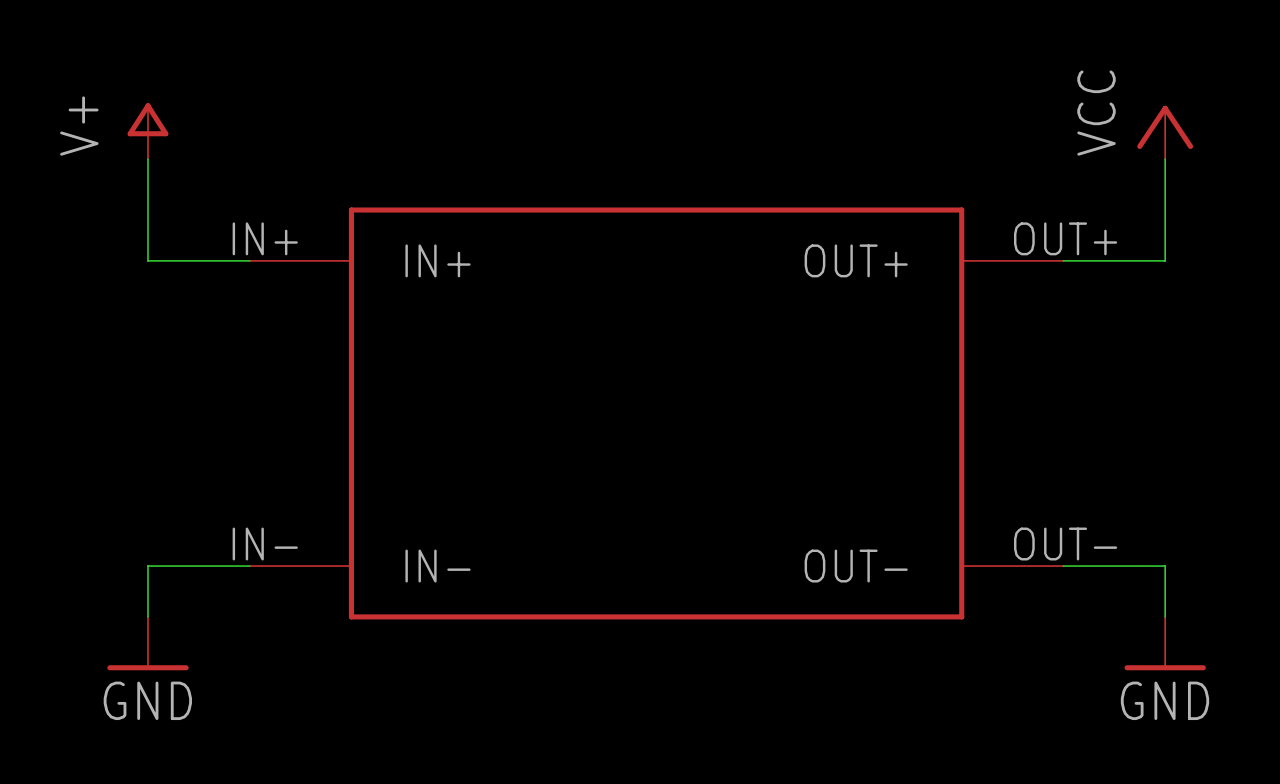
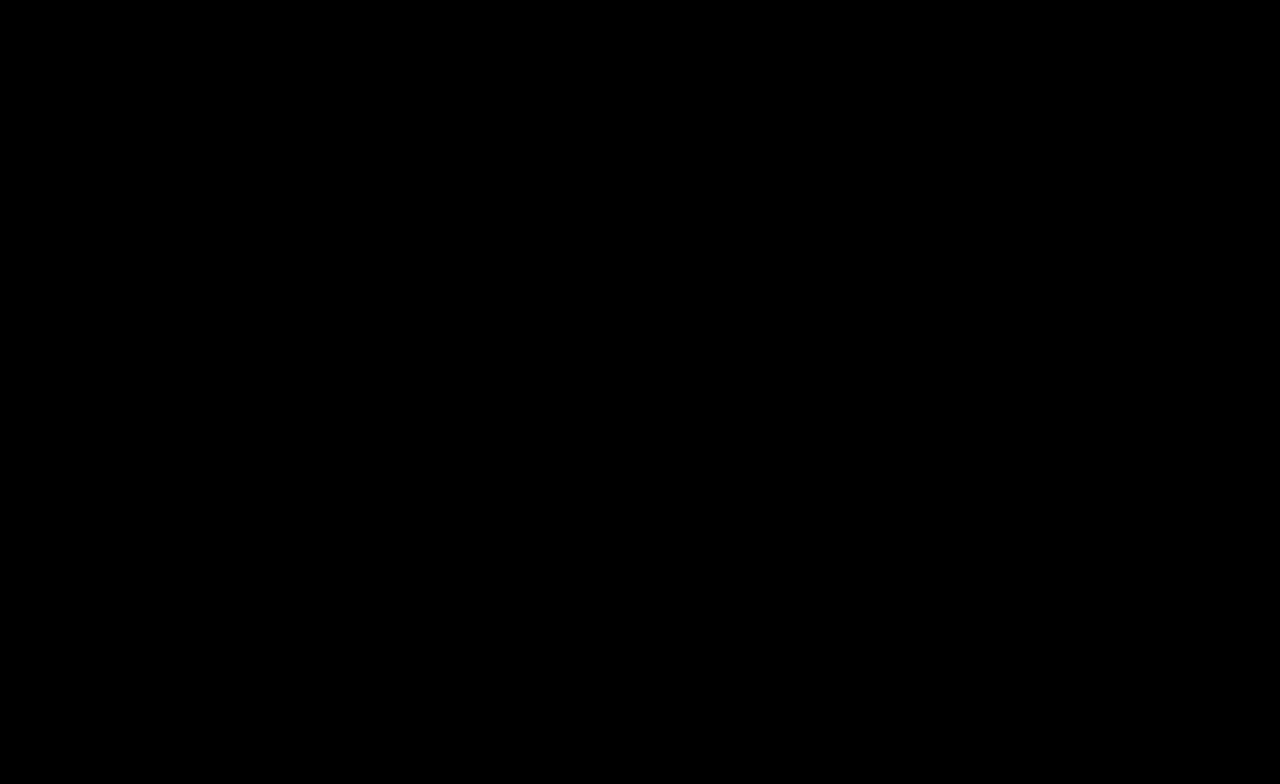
power symbol: V+ (148, 131) -> none
power symbol: VCC (1165, 132) -> none
wire: (148, 159) (148, 260) (249, 260) -> none
wire: (1165, 159) (1165, 260) (1063, 260) -> none
part: (656, 413) -> none
wire: (249, 566) (148, 566) (148, 616) -> none
wire: (1063, 566) (1165, 566) (1165, 616) -> none
power symbol: GND (148, 643) -> none
power symbol: GND (1165, 643) -> none

